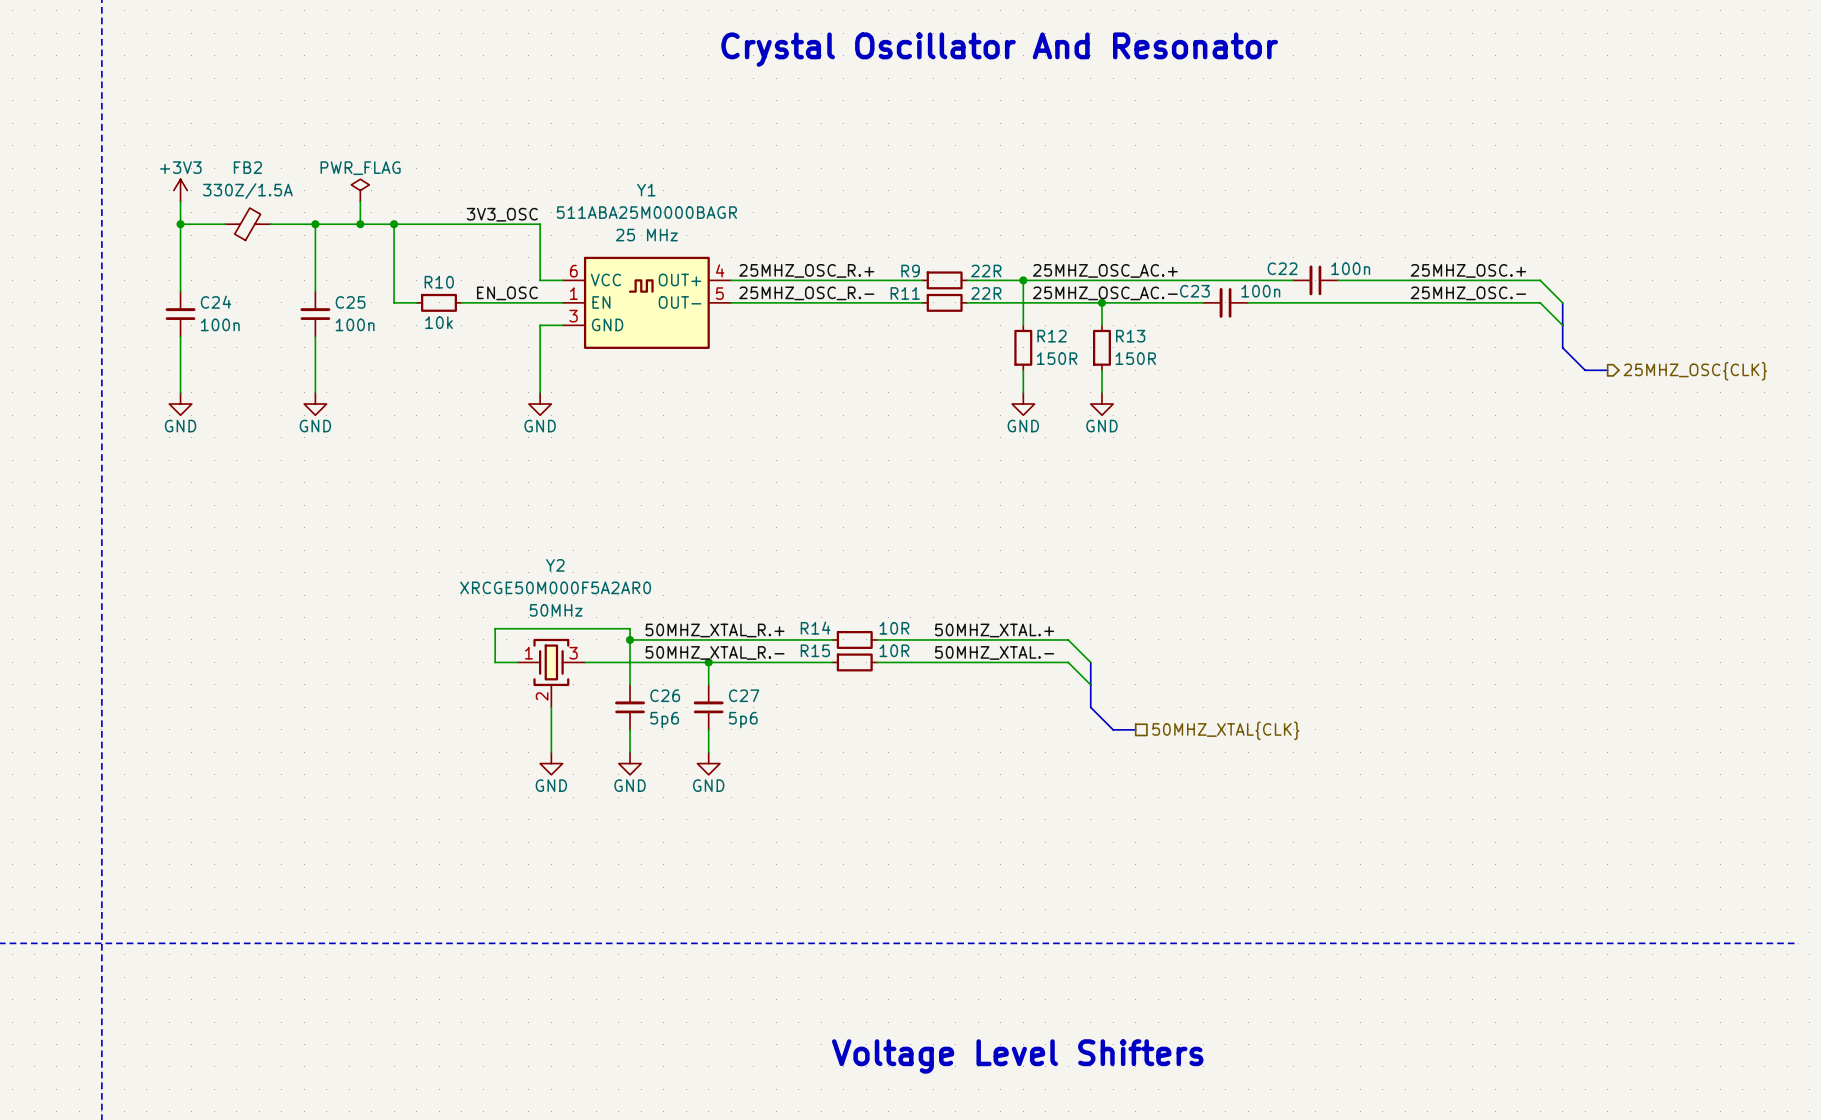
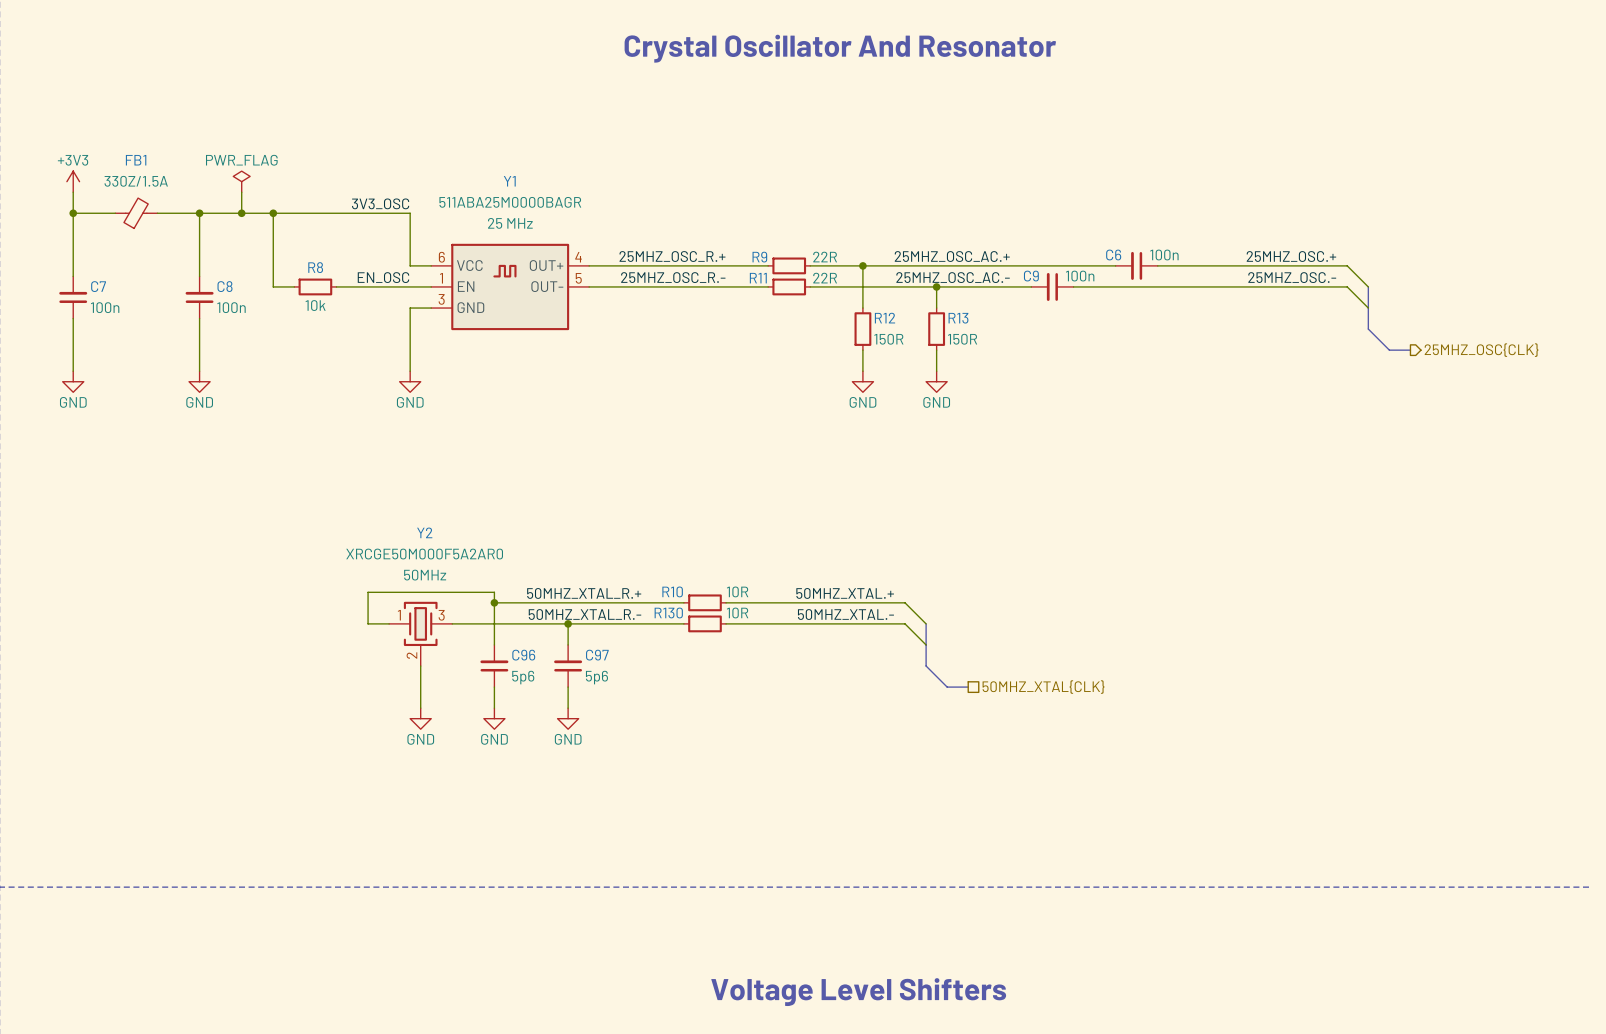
FB2 name: FB2 (247, 167) -> FB1 (136, 160)
C22 name: C22 (1282, 268) -> C6 (1113, 254)
R10 name: R10 (439, 282) -> R8 (315, 267)
C23 name: C23 (1194, 291) -> C9 (1031, 276)
C24 name: C24 (215, 302) -> C7 (98, 286)
C25 name: C25 (350, 302) -> C8 (224, 286)
R14 name: R14 (815, 628) -> R10 (672, 591)
R15 name: R15 (815, 650) -> R130 (668, 612)
C26 name: C26 (665, 695) -> C96 (523, 655)
C27 name: C27 (744, 695) -> C97 (597, 655)

